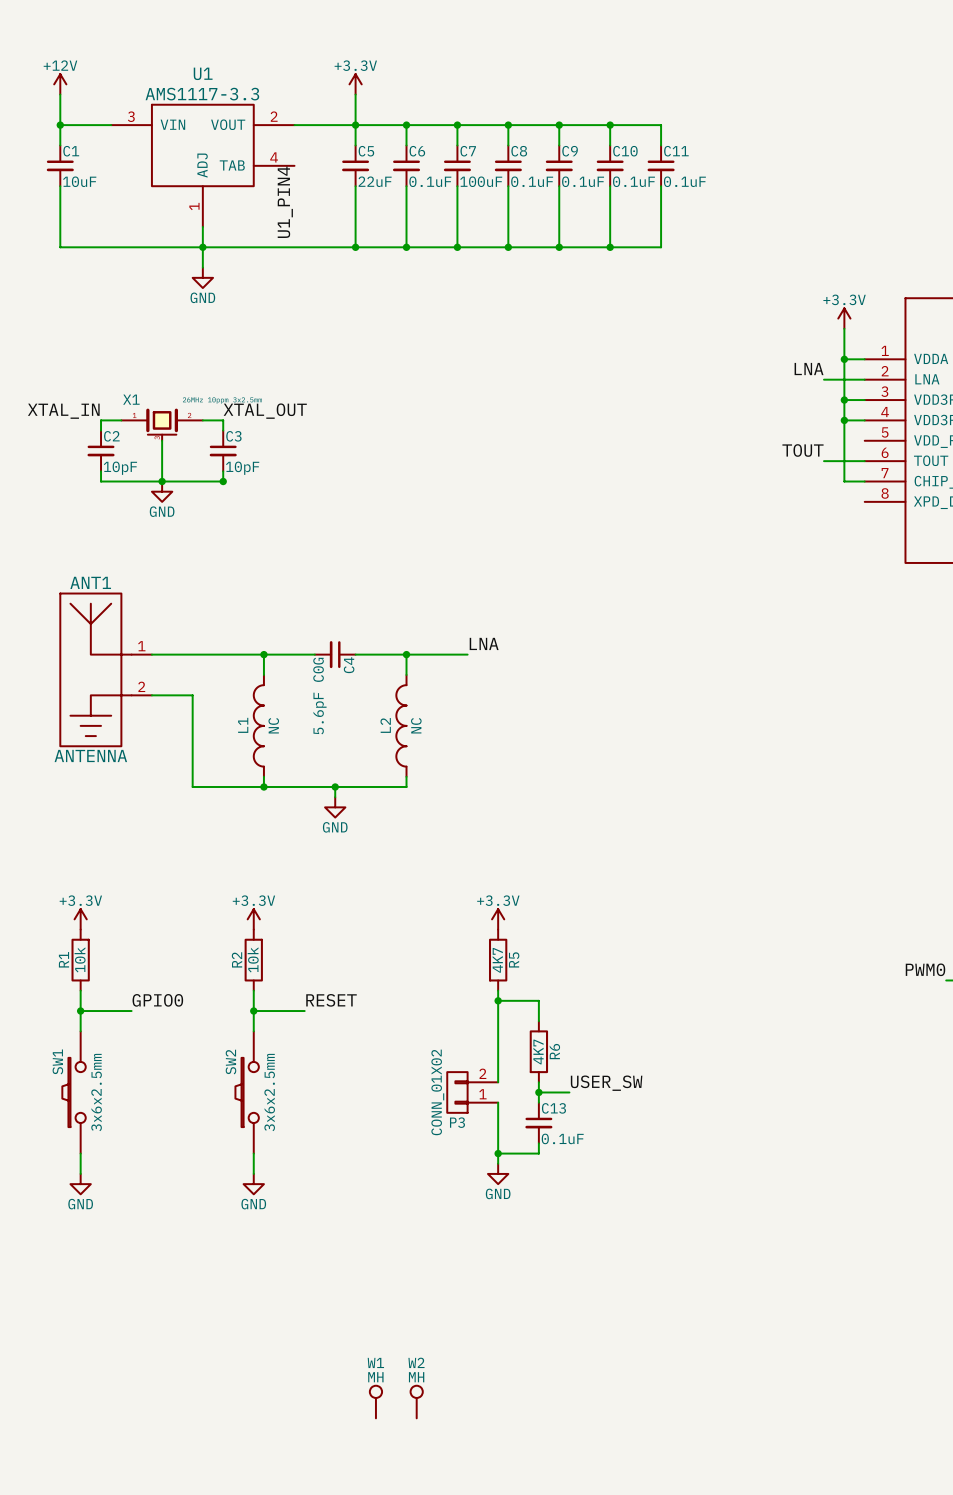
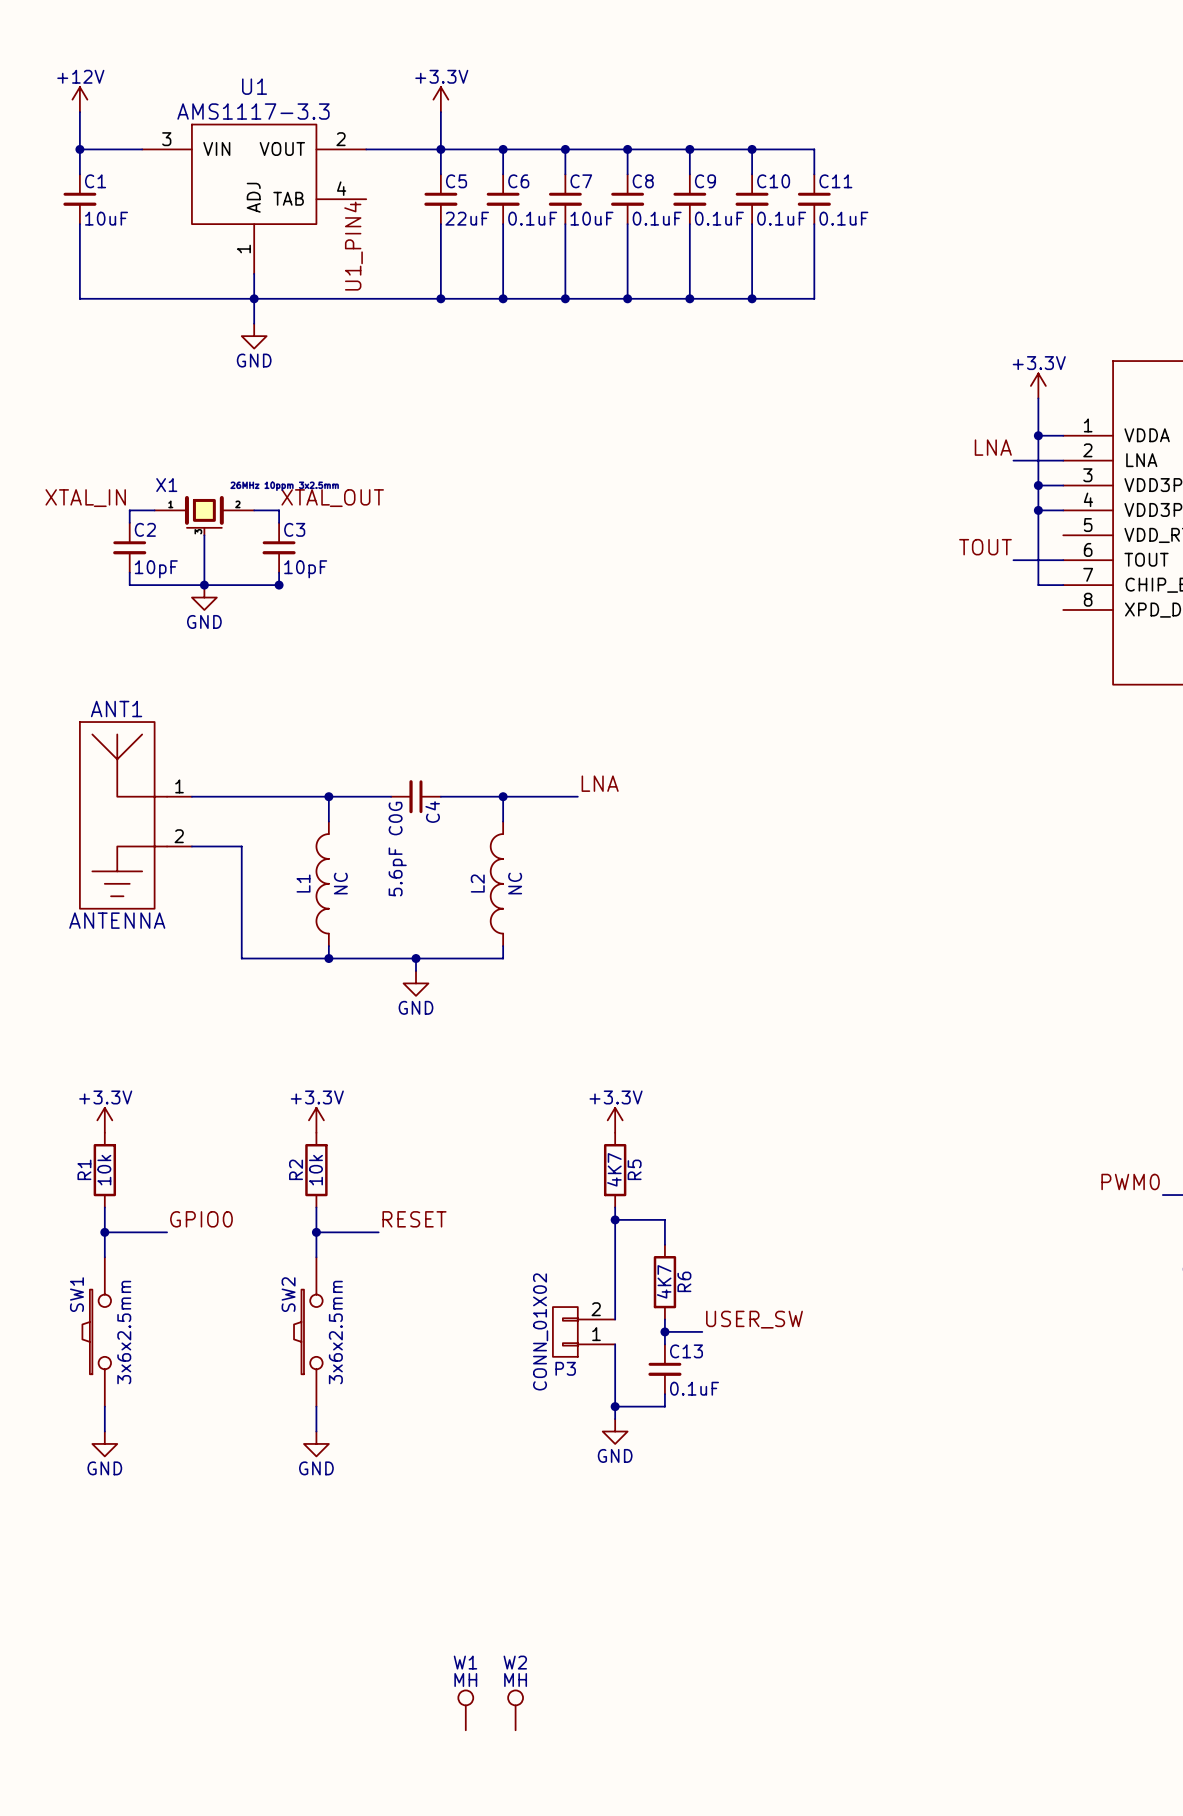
C7 value: 100uF (481, 181) -> 10uF (591, 218)

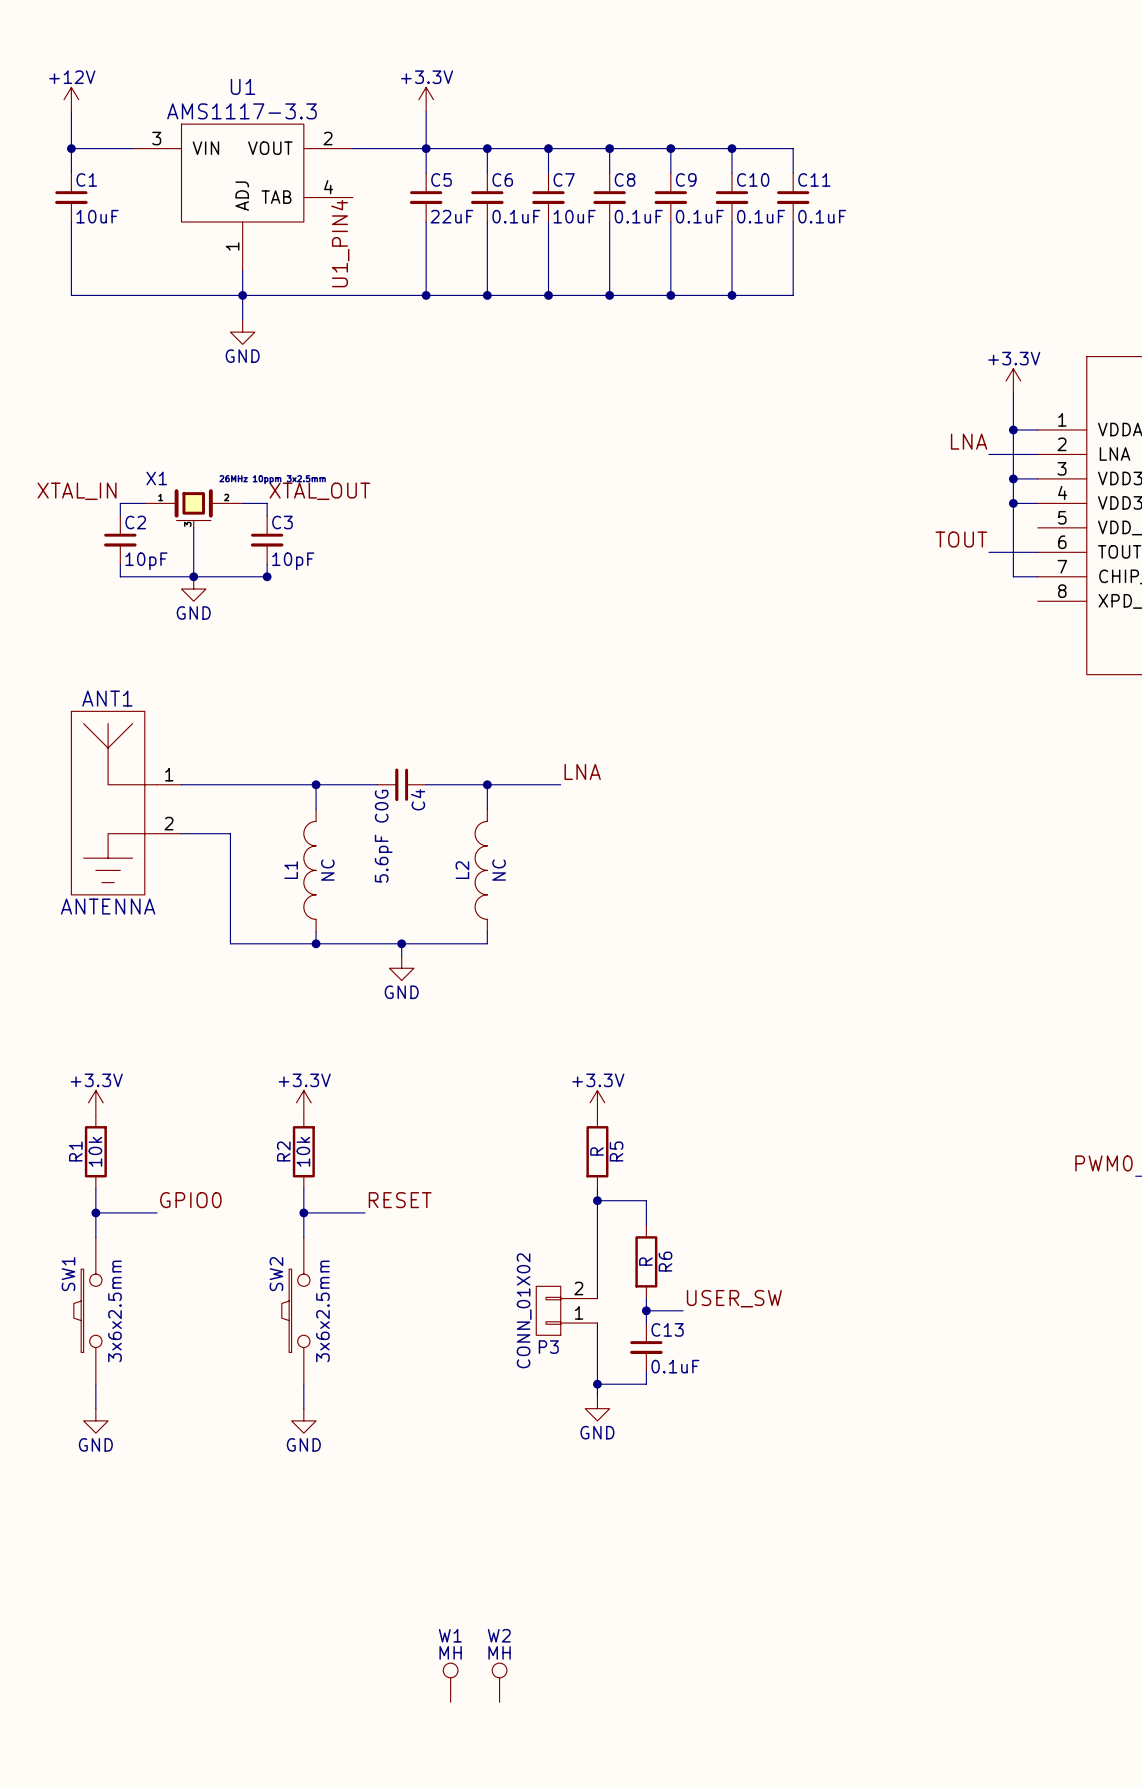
R5 value: 4K7 (614, 1169) -> R (596, 1151)
R6 value: 4K7 (664, 1281) -> R (645, 1261)

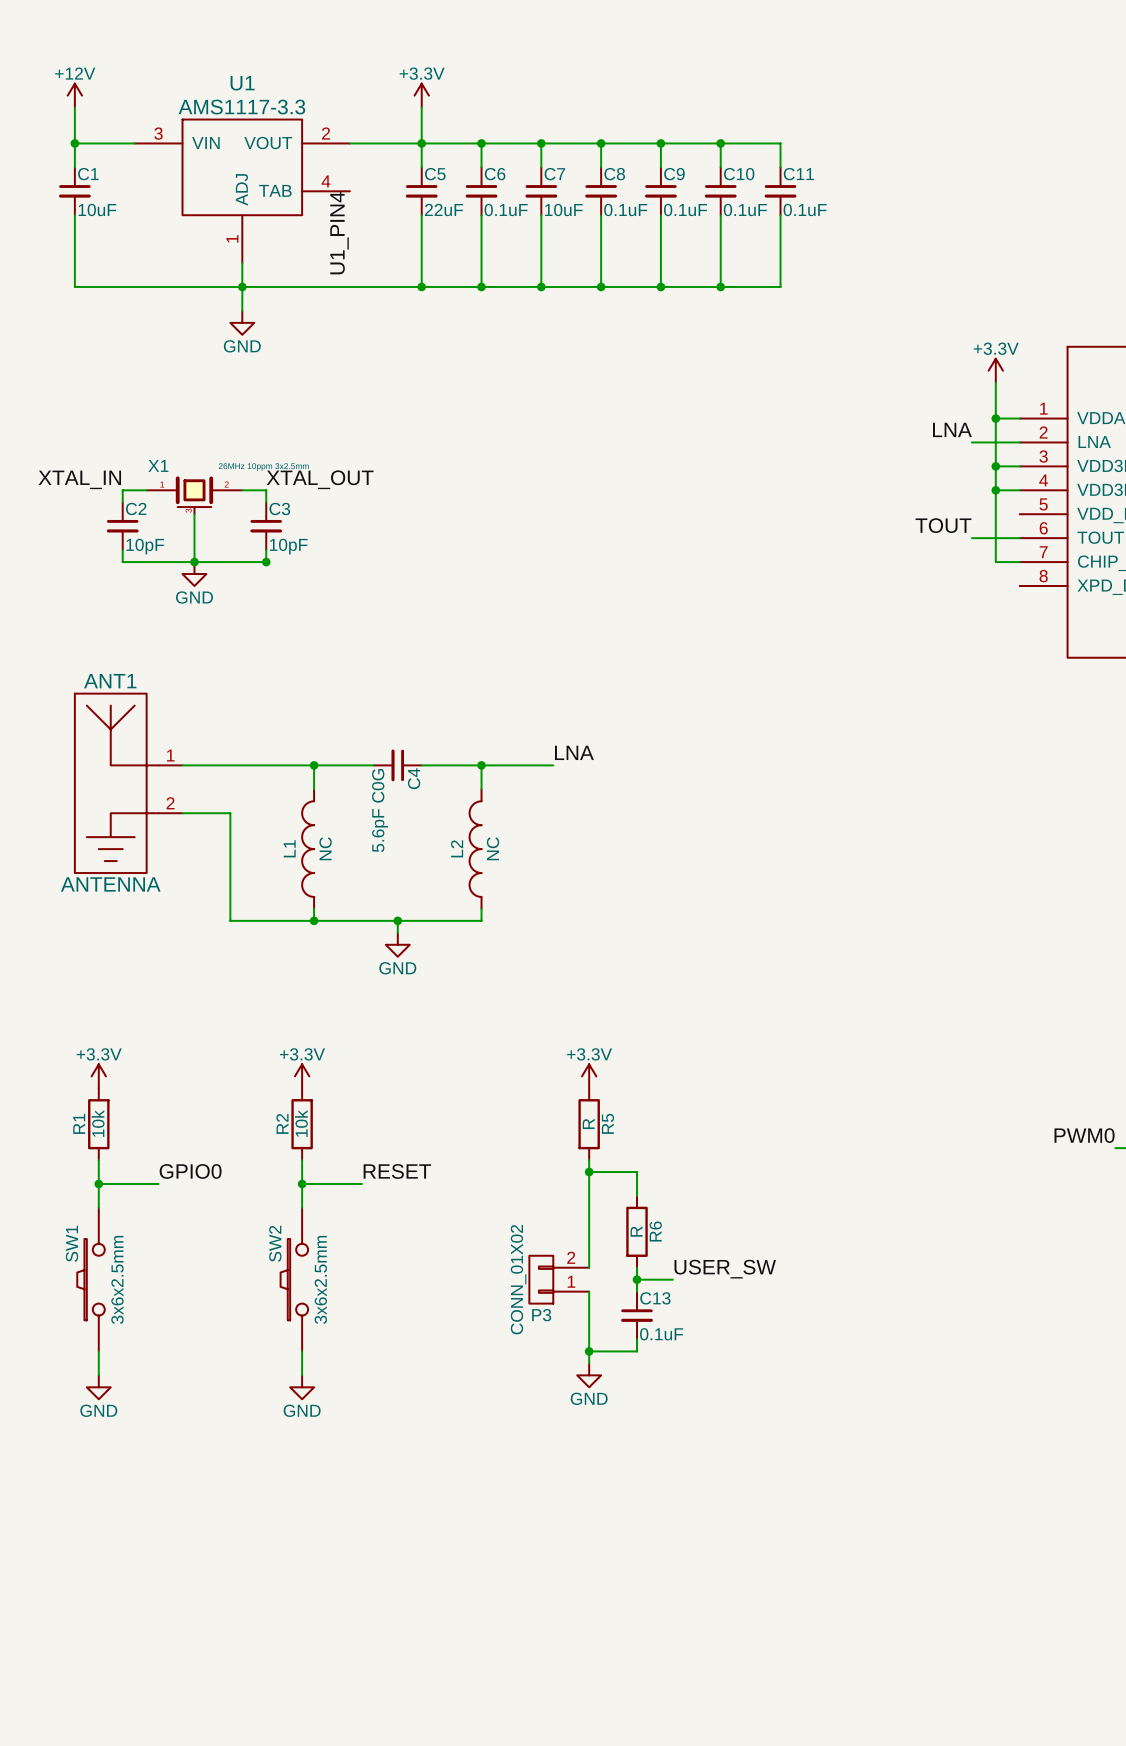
W1: MH (450, 1682) -> none
W2: MH (499, 1682) -> none

